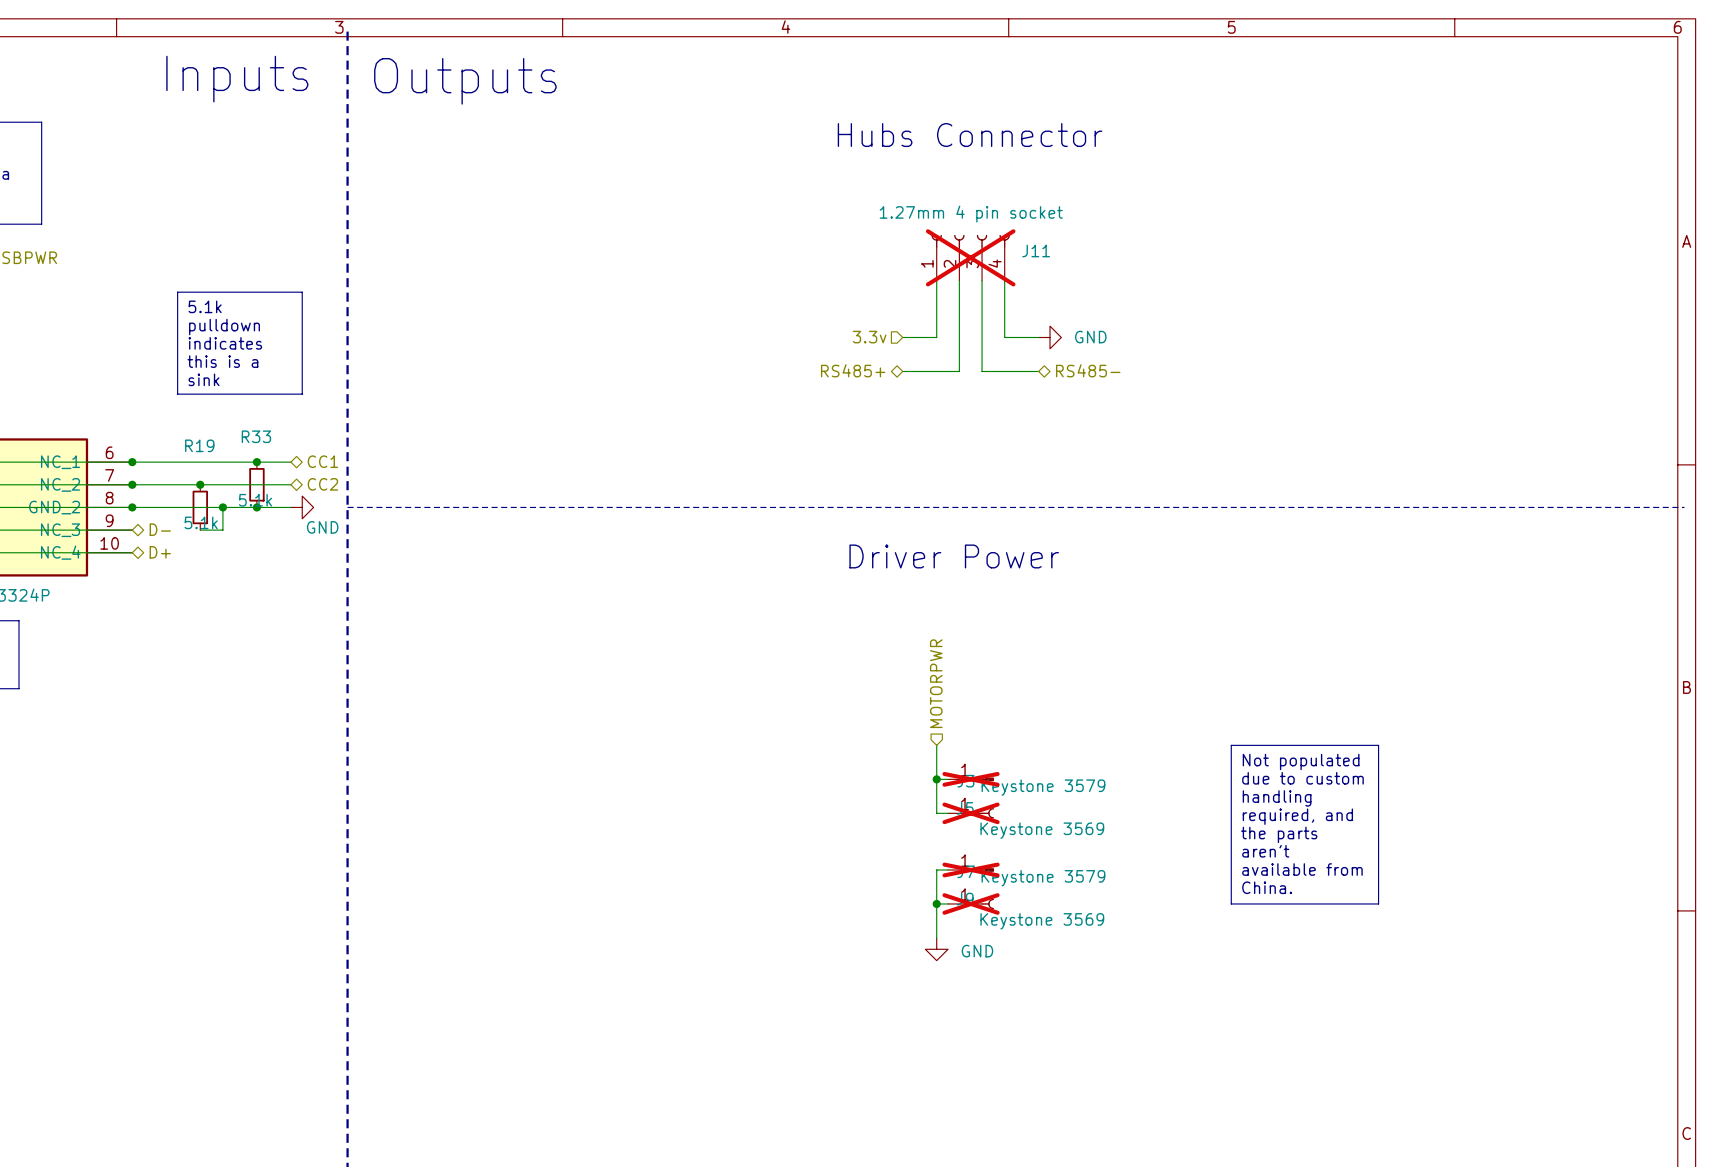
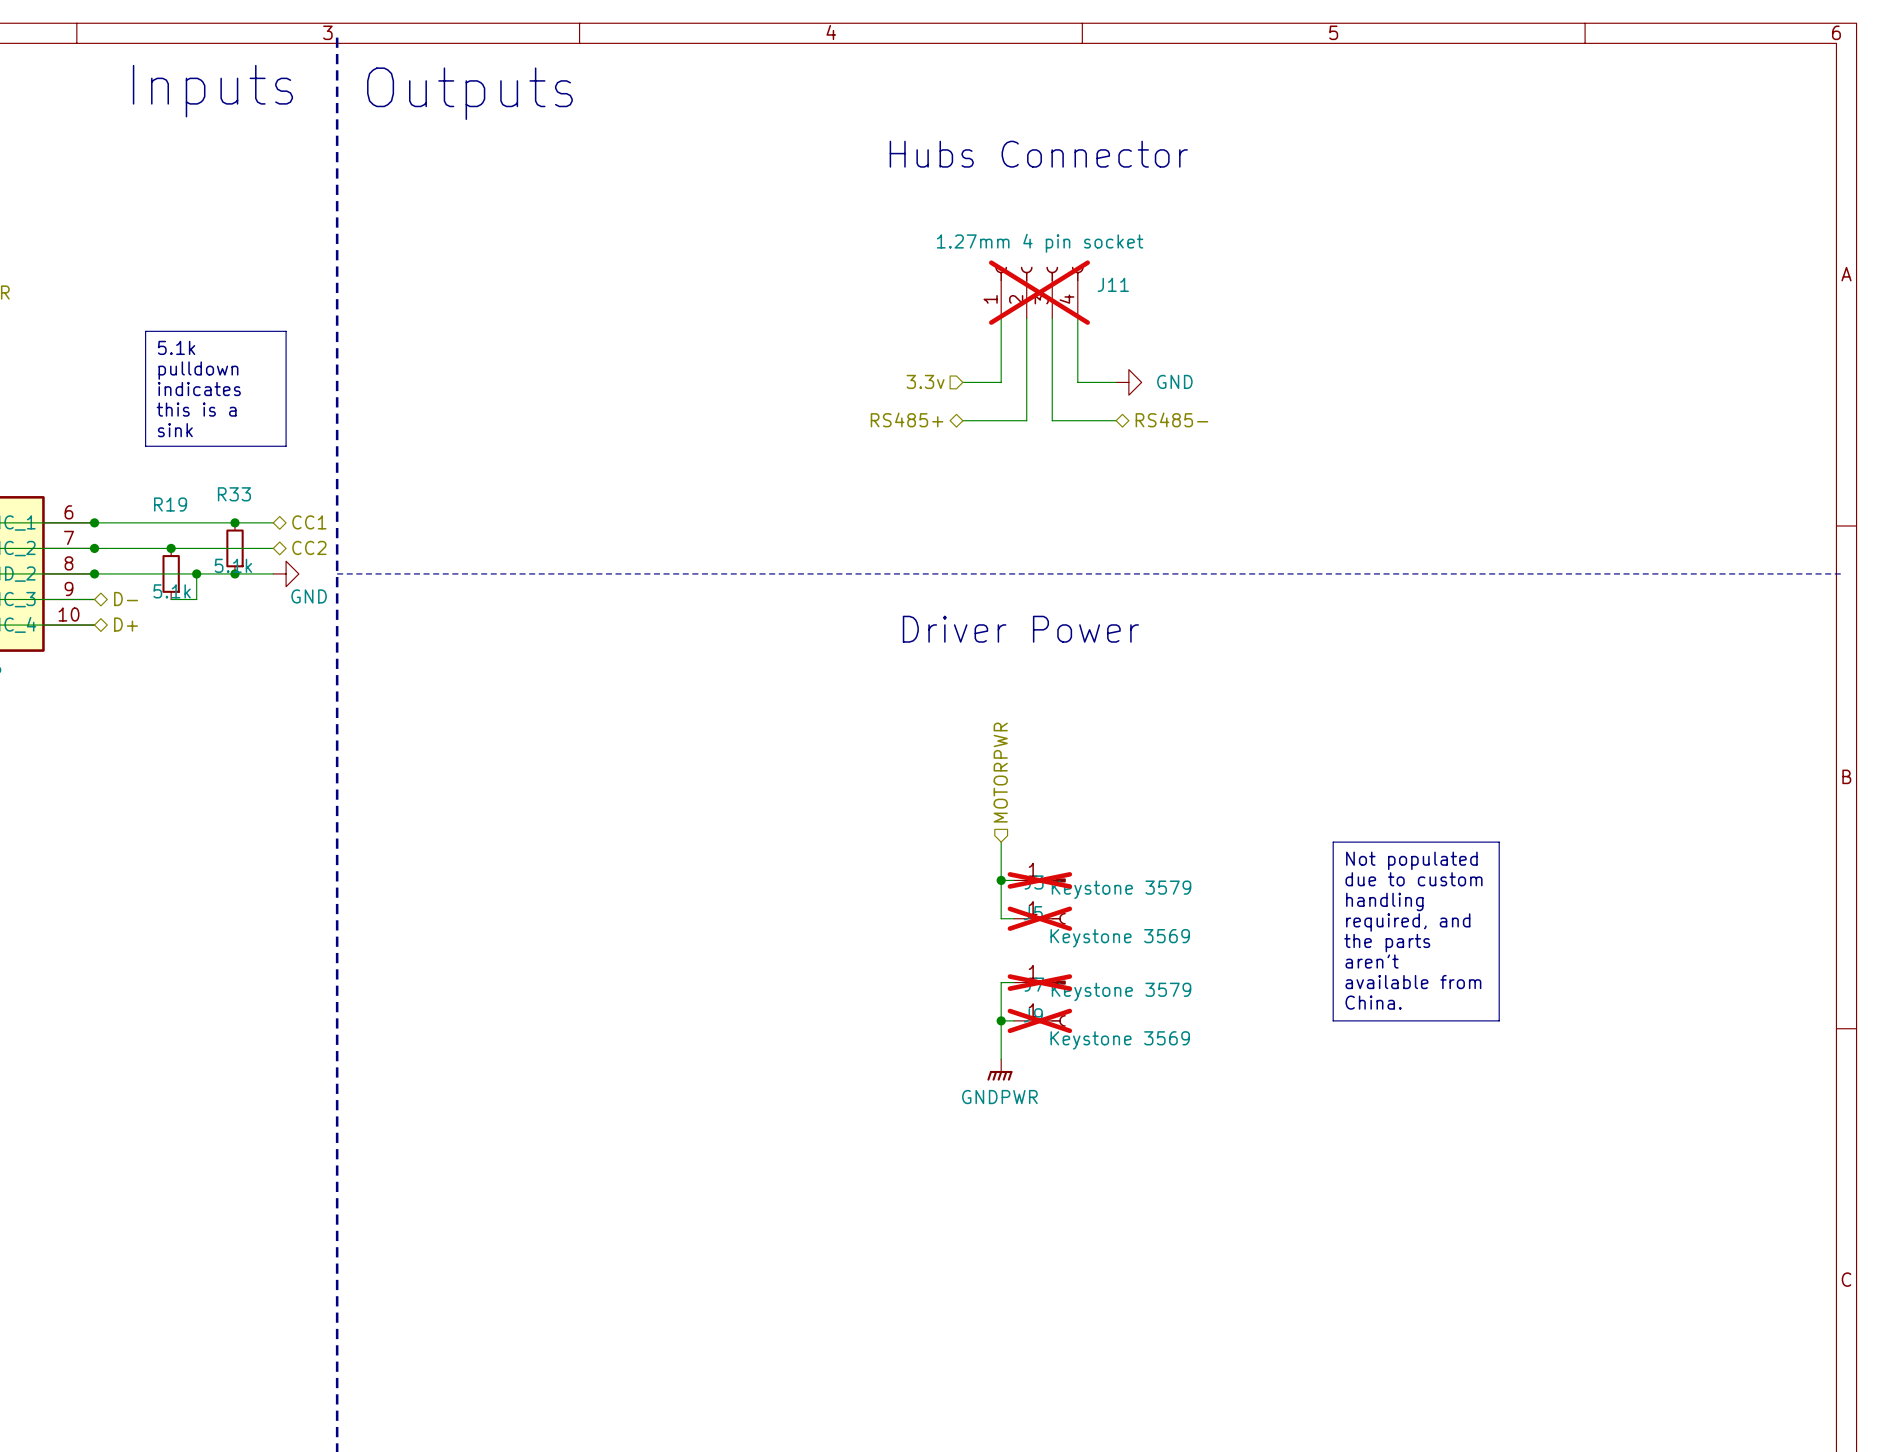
power symbol: GND (936, 949) -> GNDPWR (999, 1069)

